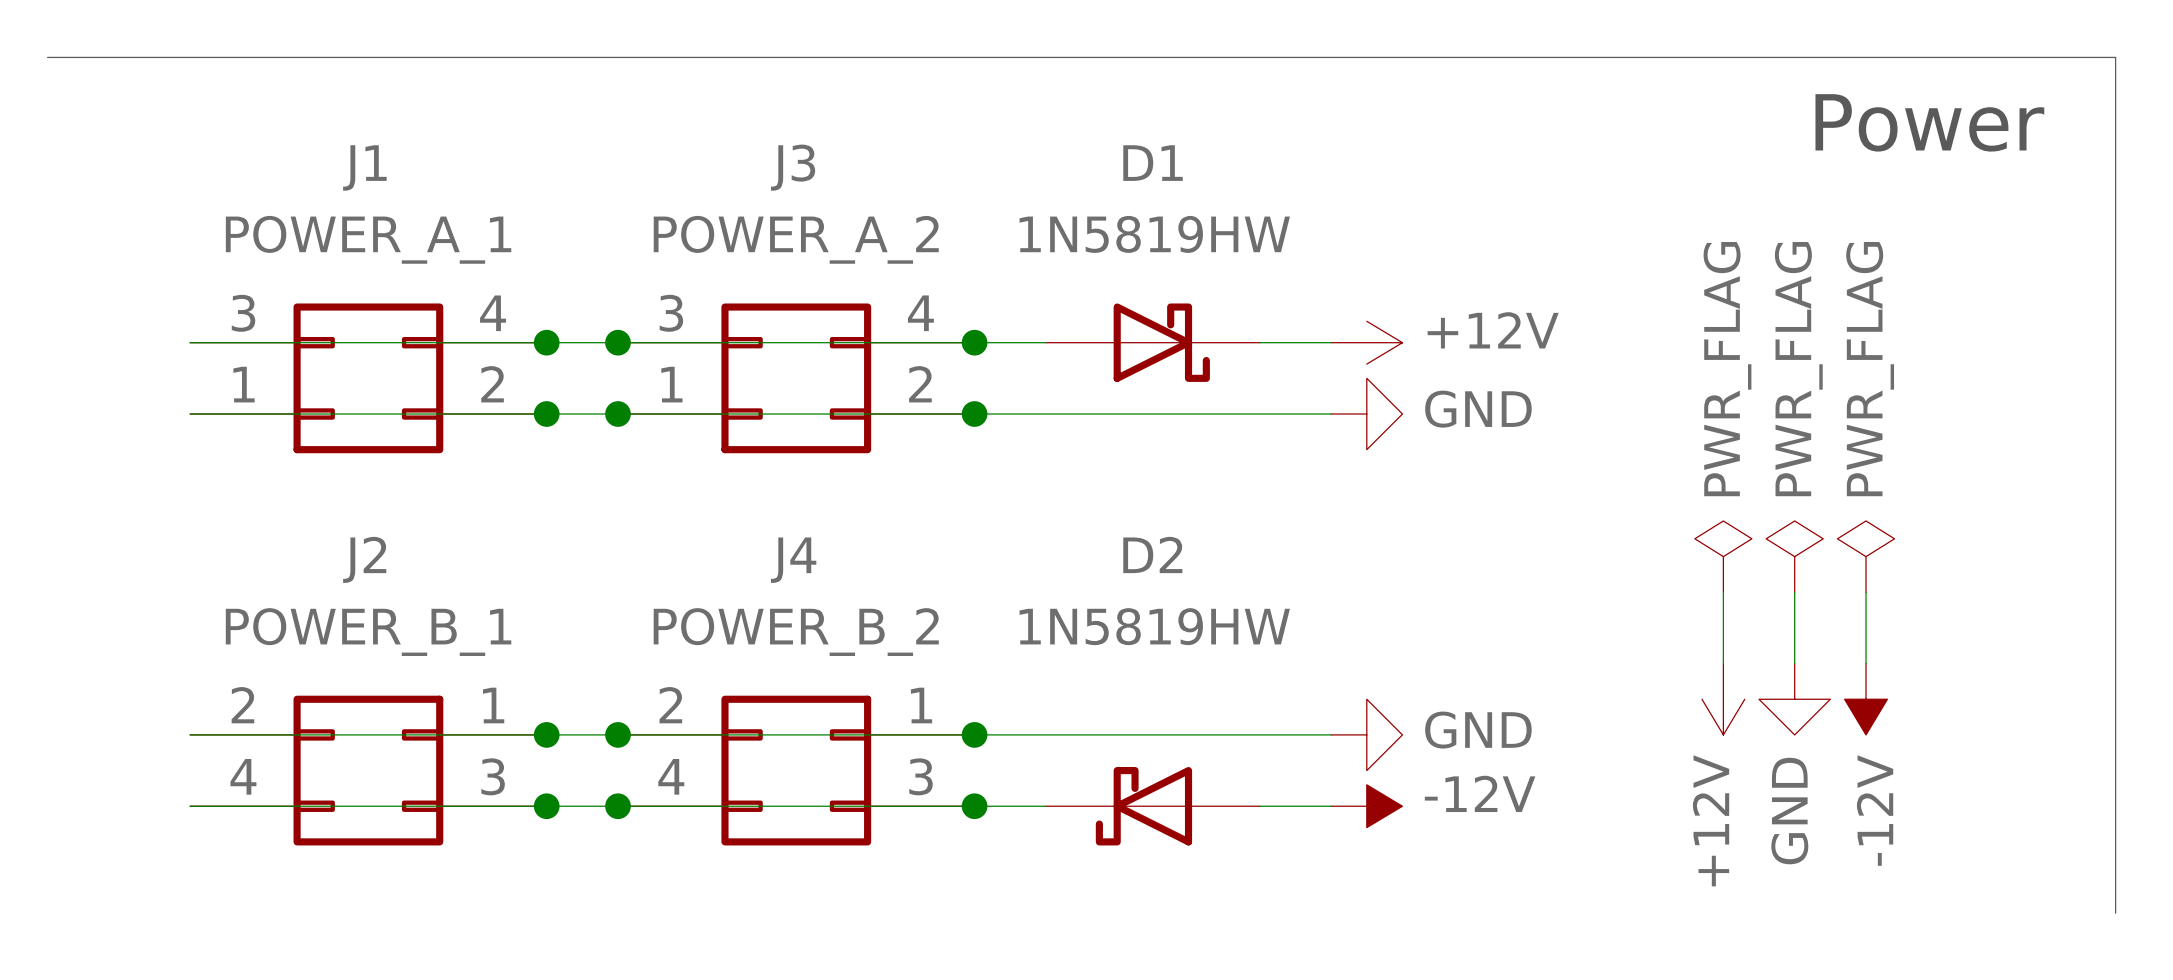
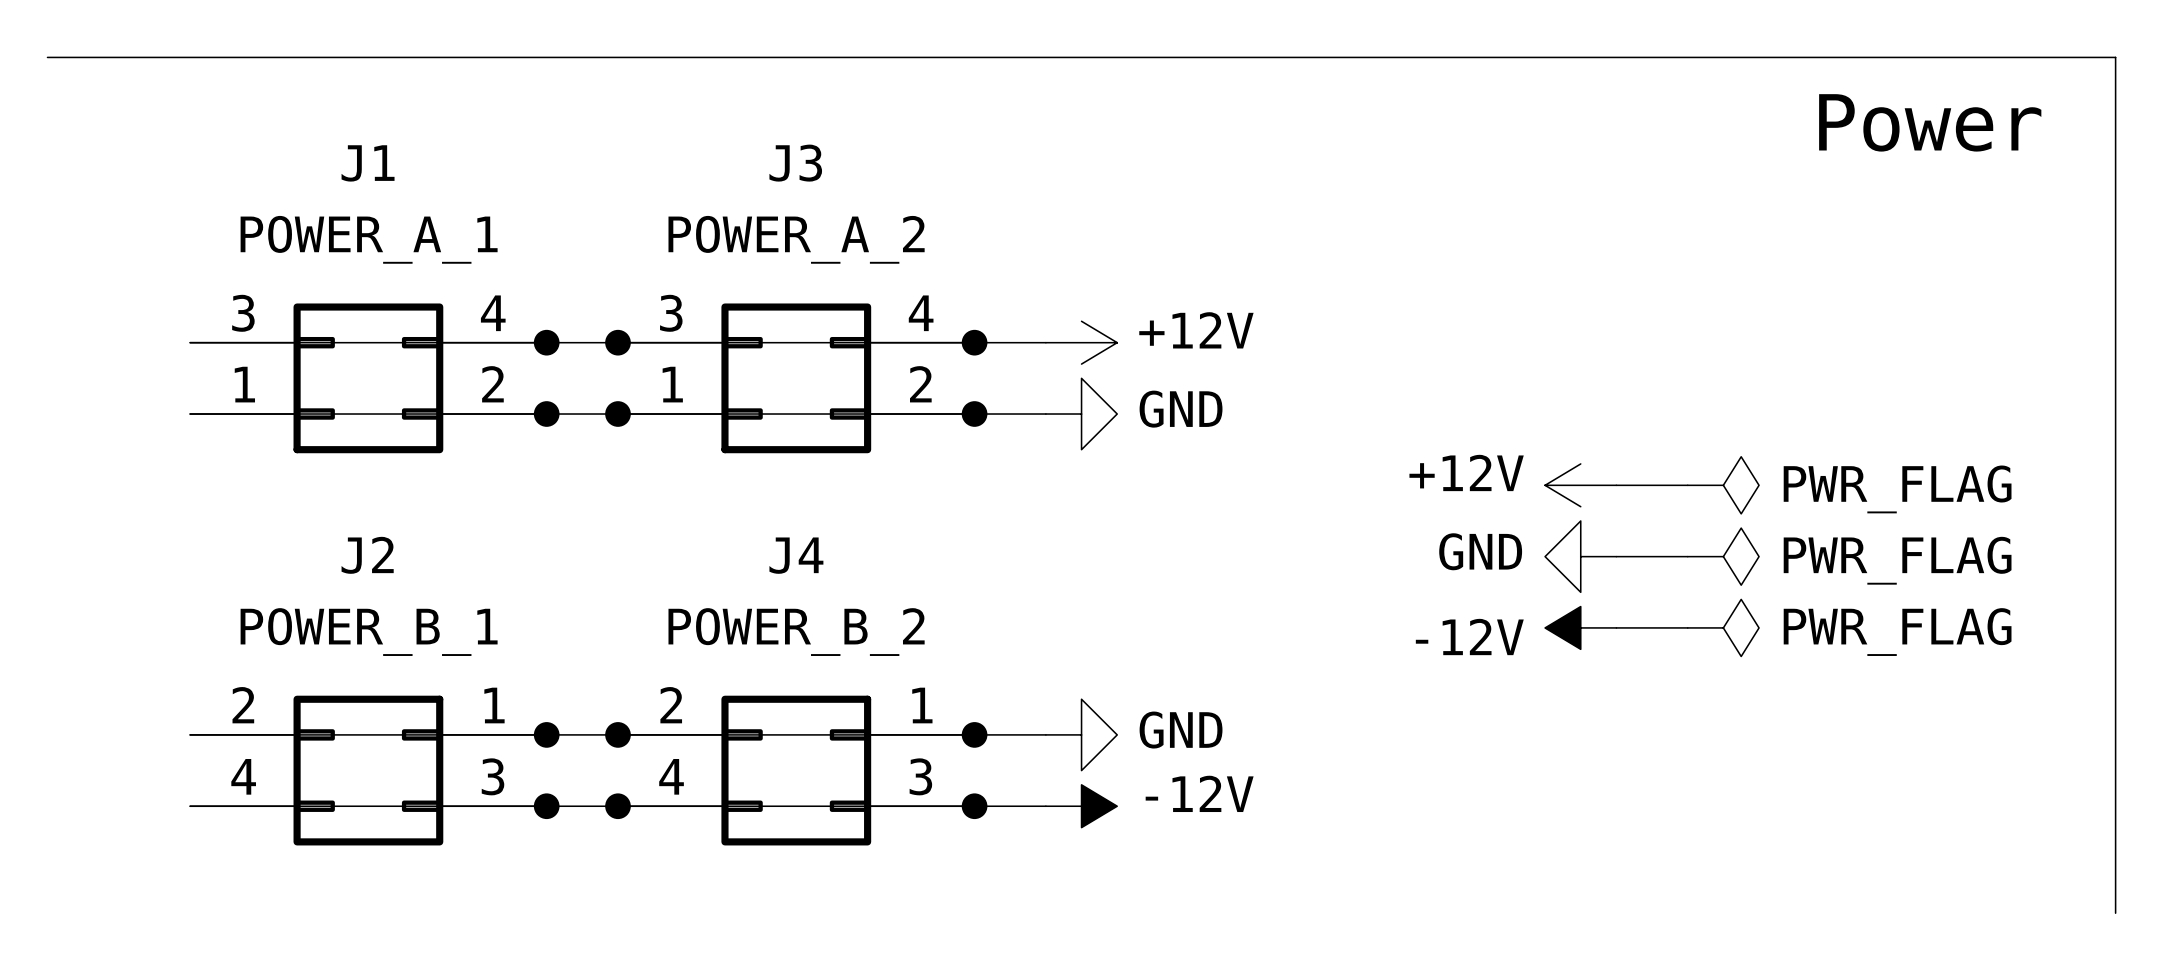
power symbol: none -> +12V (1081, 342)
D1: 1N5819HW (1152, 342) -> none
wire: (1259, 342) (1331, 342) -> (1616, 485) (1687, 485)
power symbol: +12V (1366, 342) -> none
wire: (1045, 414) (1331, 414) -> none
power symbol: none -> GND (1081, 414)
power symbol: GND (1366, 414) -> none
power symbol: none -> +12V (1580, 485)
power symbol: none -> PWR_FLAG (1723, 485)
power symbol: none -> GND (1580, 556)
wire: none -> (1616, 556) (1687, 556)
power symbol rotation: 0° (1723, 556) -> 90° clockwise (1723, 556)
power symbol: PWR_FLAG (1794, 556) -> none
power symbol: PWR_FLAG (1866, 556) -> none
wire: (1723, 592) (1723, 663) -> none
wire: (1794, 592) (1794, 663) -> none
wire: (1866, 592) (1866, 663) -> none
power symbol: none -> -12V (1580, 627)
power symbol: none -> PWR_FLAG (1723, 627)
power symbol: +12V (1723, 699) -> none
power symbol: GND (1794, 699) -> none
power symbol: -12V (1866, 699) -> none
wire: (1045, 734) (1331, 734) -> none
power symbol: none -> GND (1081, 734)
power symbol: GND (1366, 734) -> none
power symbol: none -> -12V (1081, 806)
D2: 1N5819HW (1152, 806) -> none
wire: (1259, 806) (1331, 806) -> (1616, 627) (1687, 627)
power symbol: -12V (1366, 806) -> none

